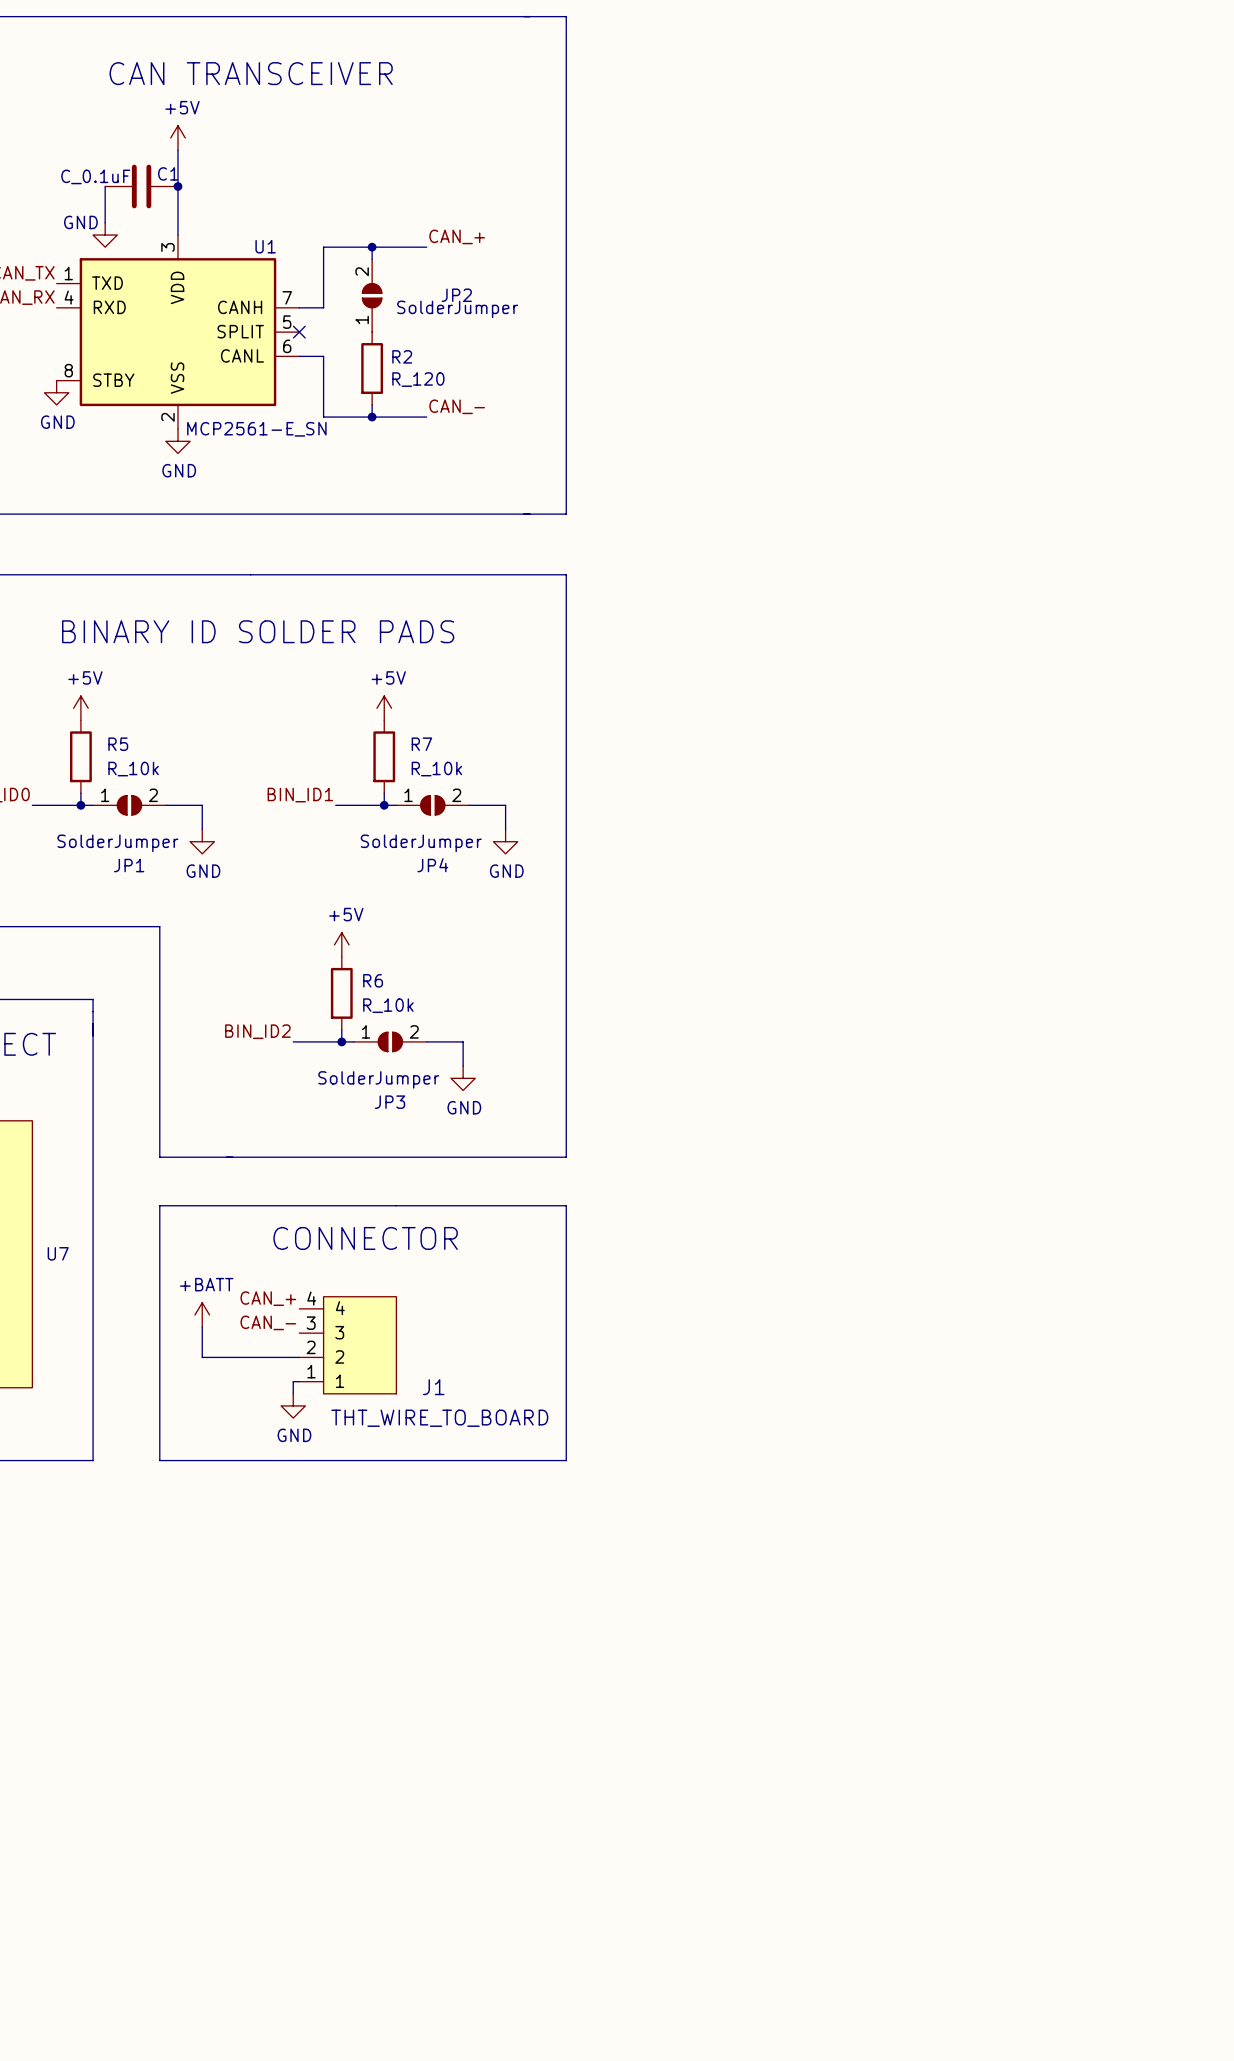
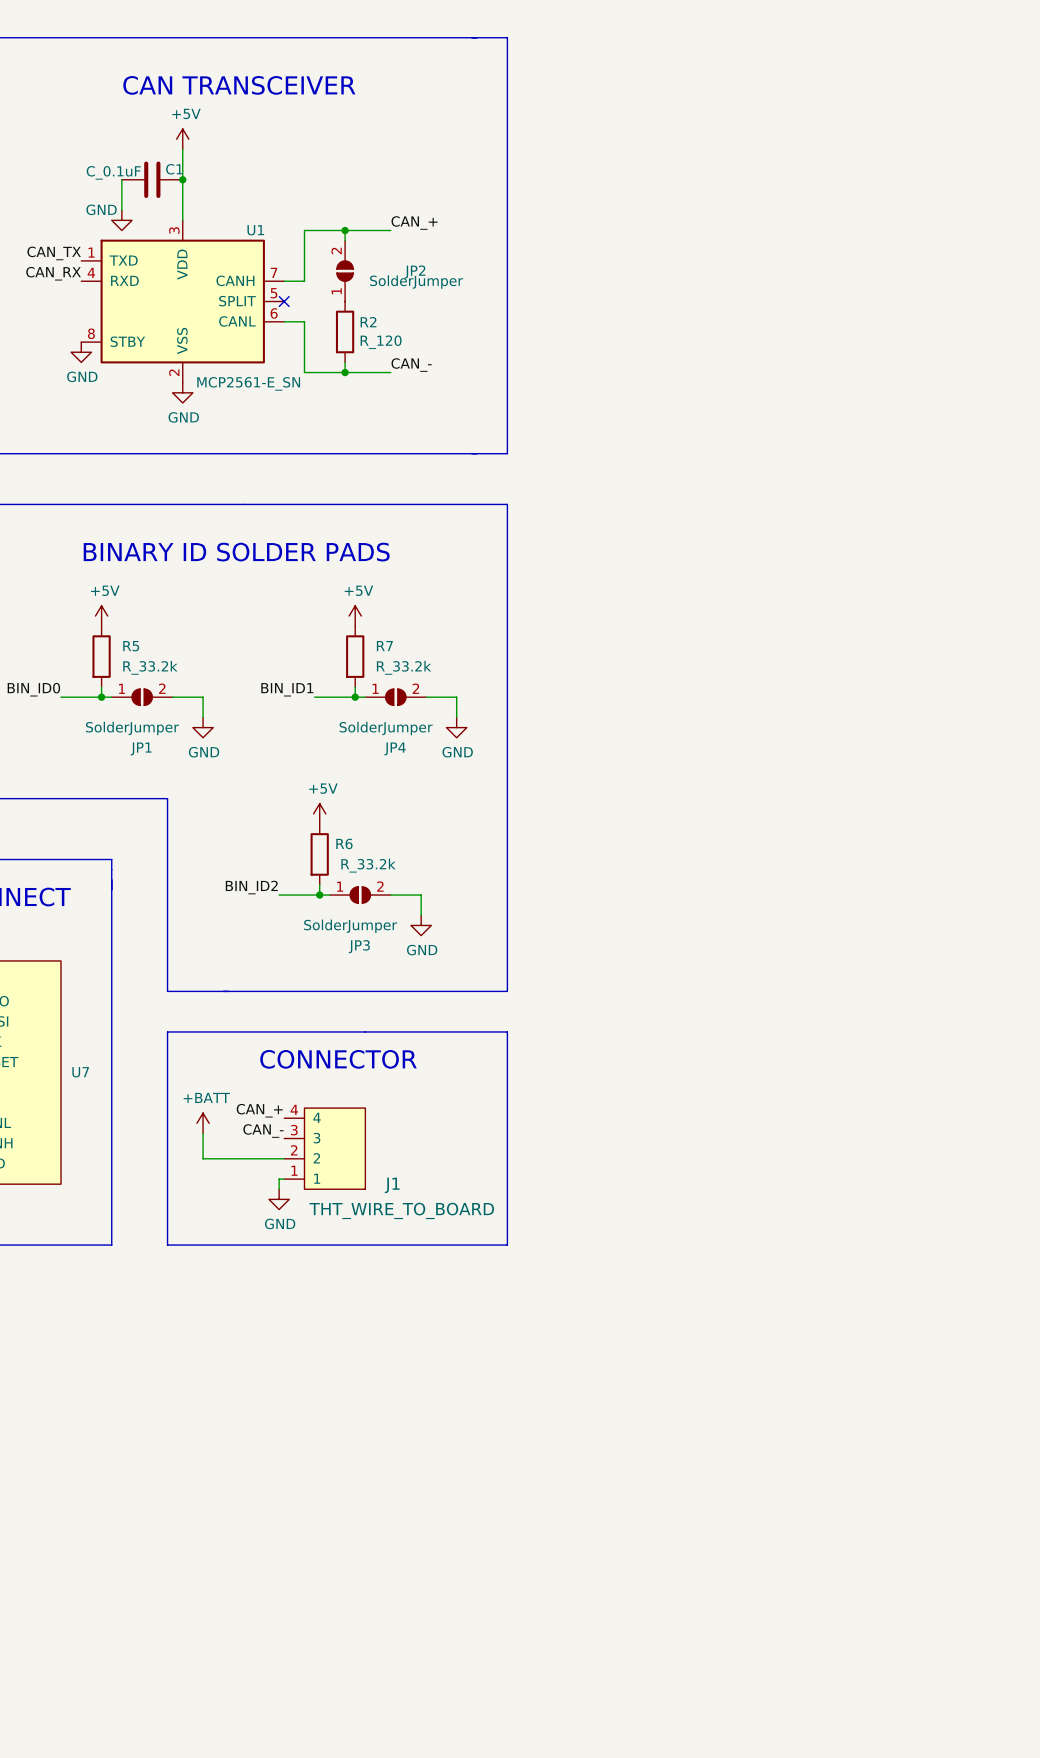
R5 value: R_10k (133, 769) -> R_33.2k (150, 667)
R7 value: R_10k (436, 769) -> R_33.2k (404, 667)
R6 value: R_10k (388, 1005) -> R_33.2k (368, 865)

